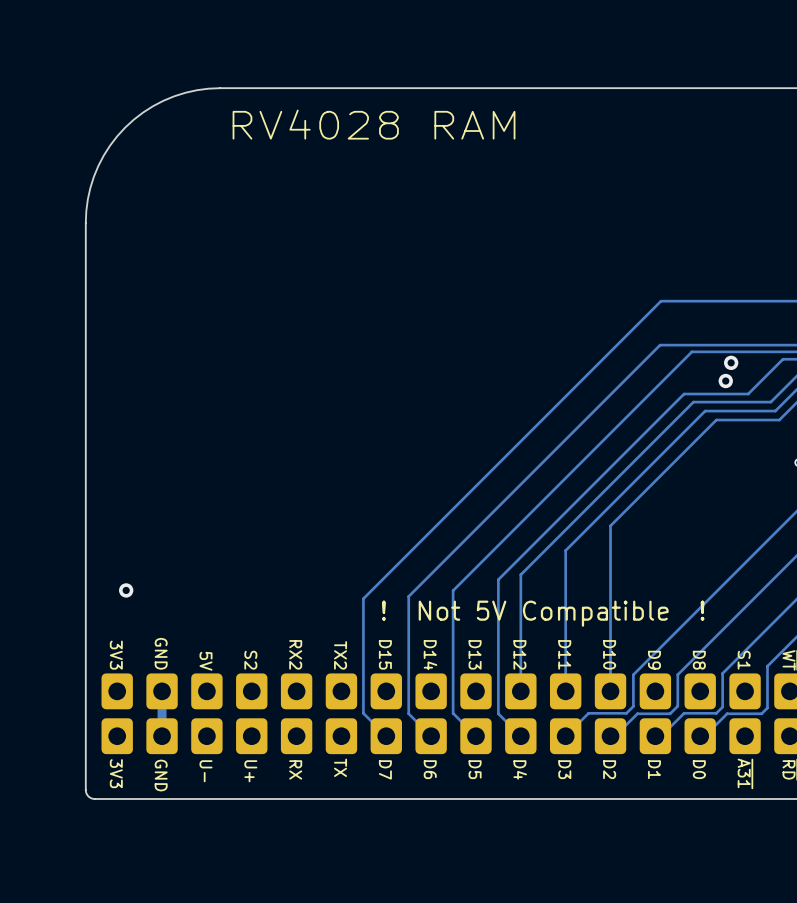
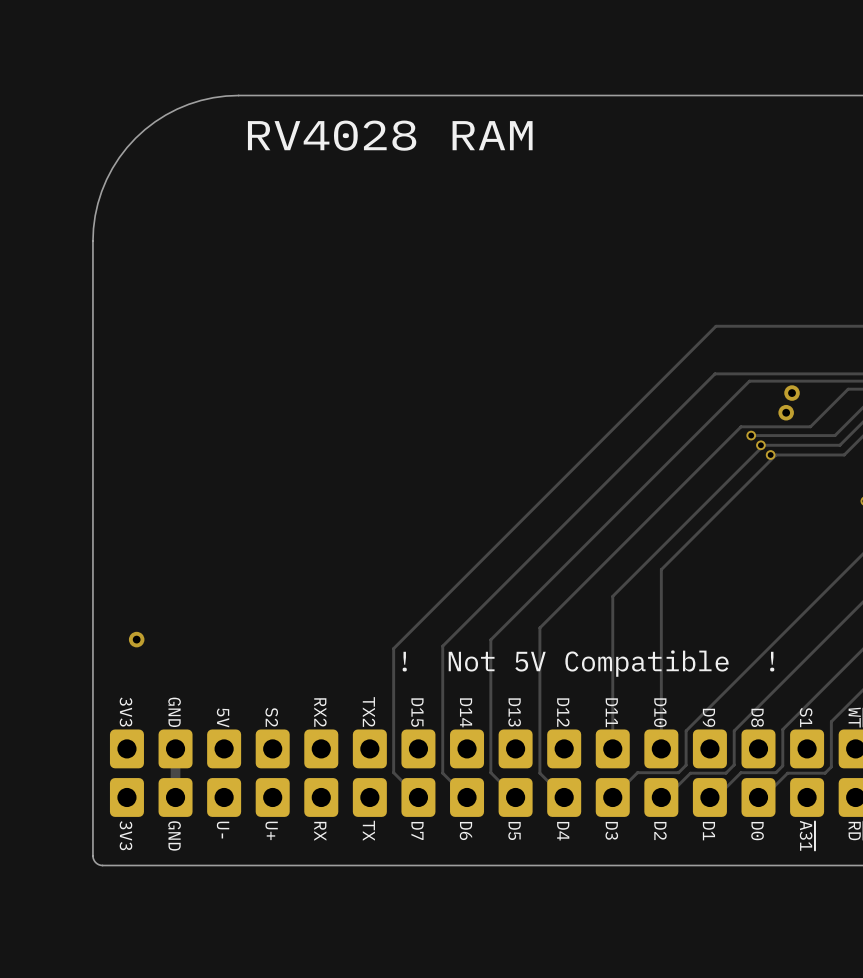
track: (693, 402) (520, 574) (520, 691) -> none
via: none -> (751, 435)
via: none -> (760, 445)
via: none -> (770, 454)

